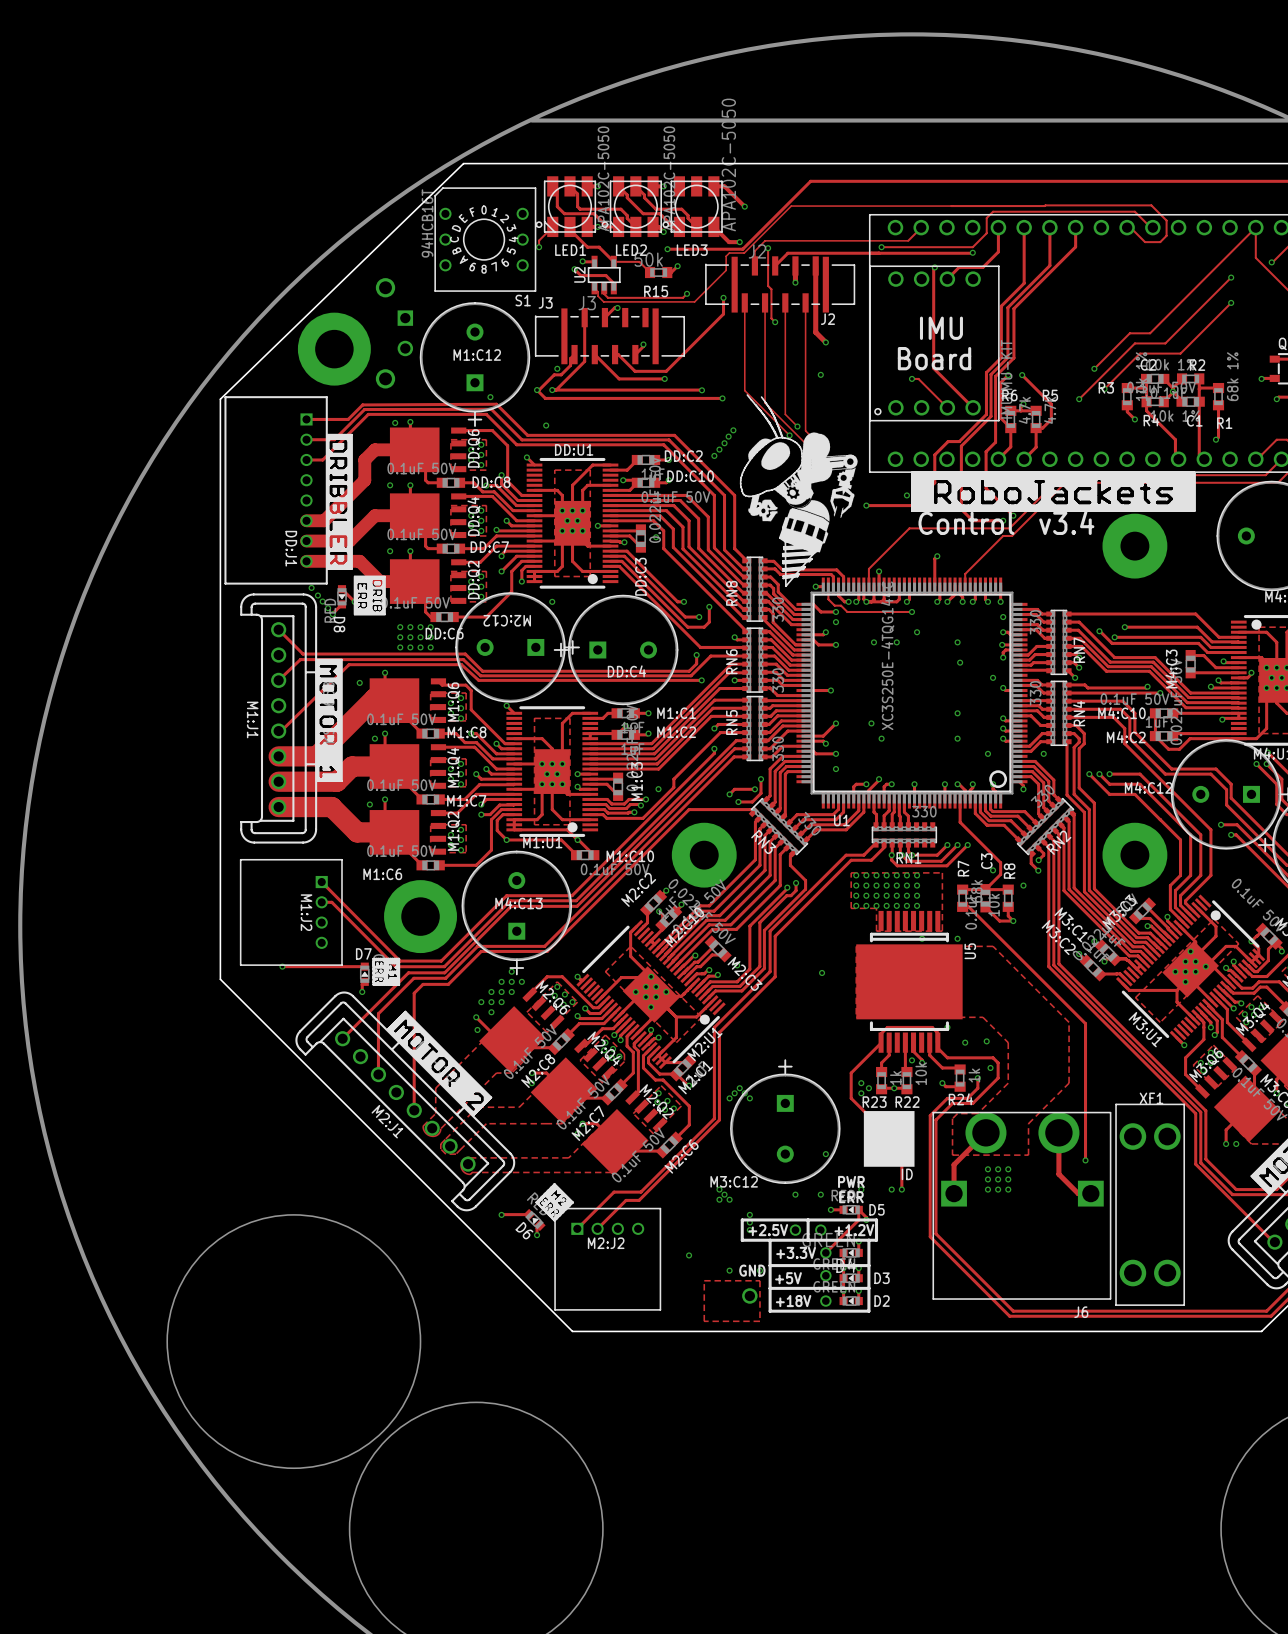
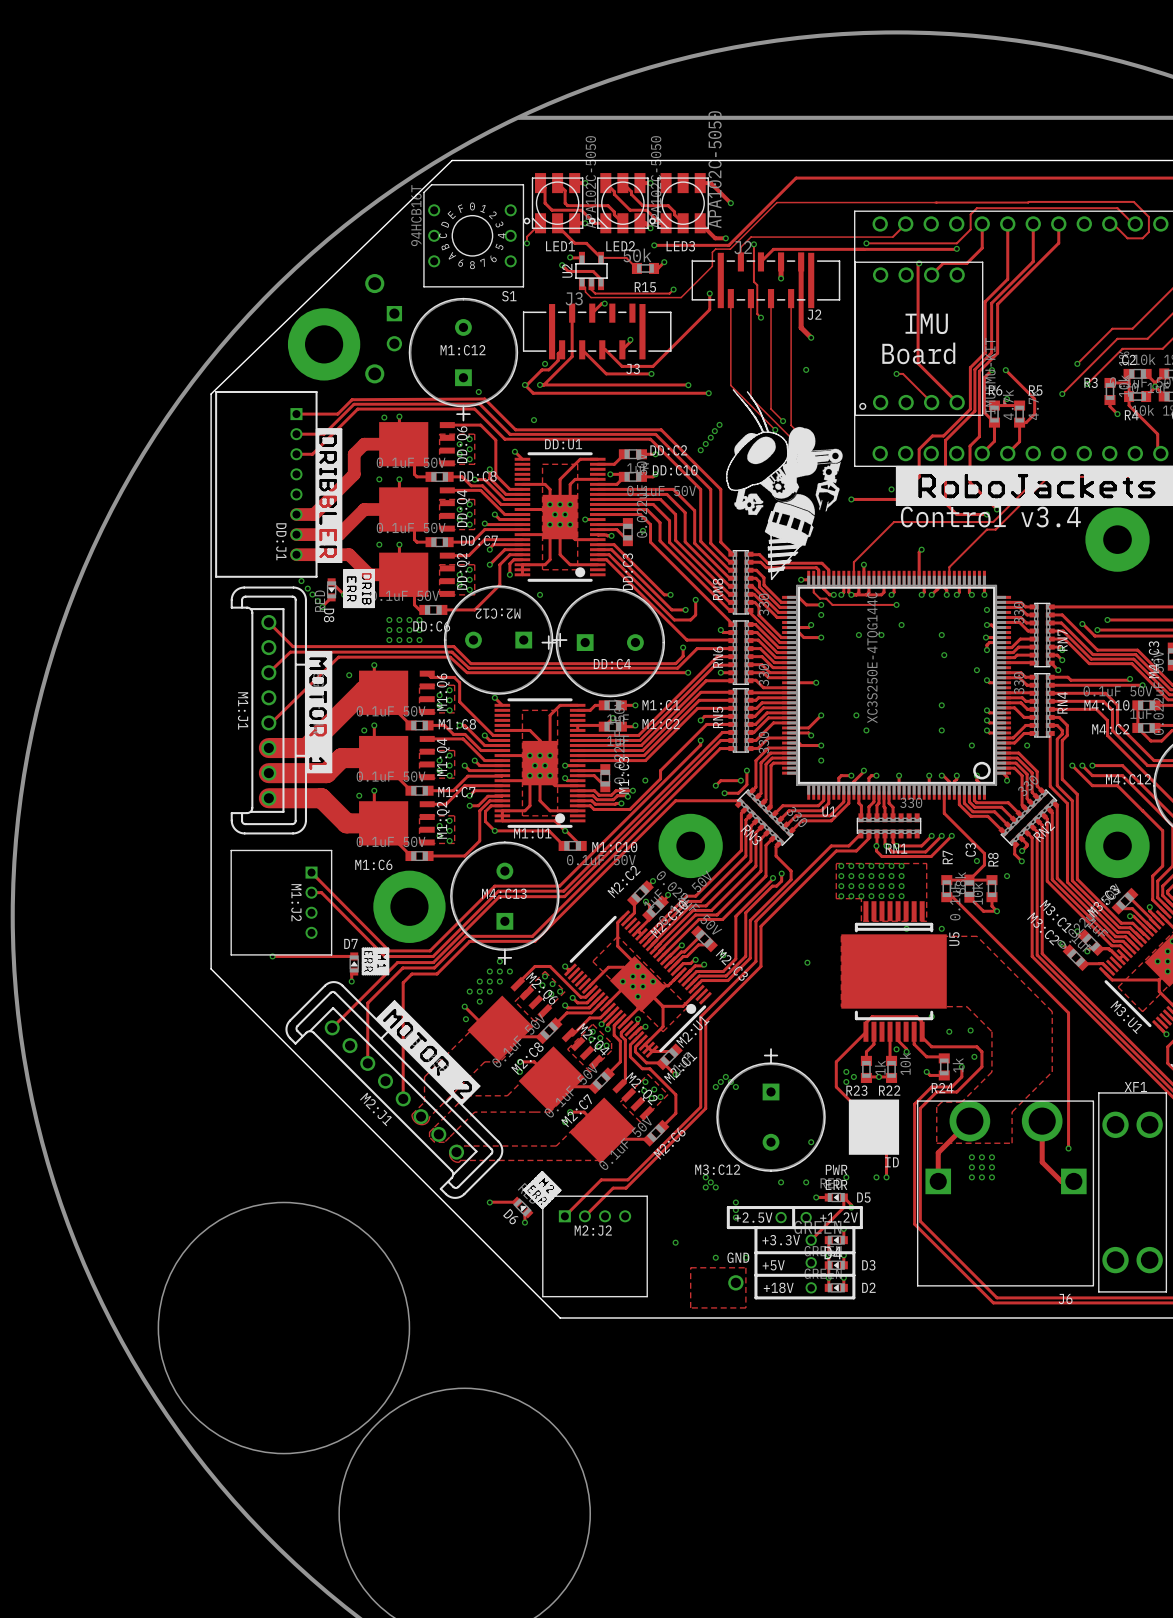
text position: J3 (545, 302) -> J3 (633, 368)

